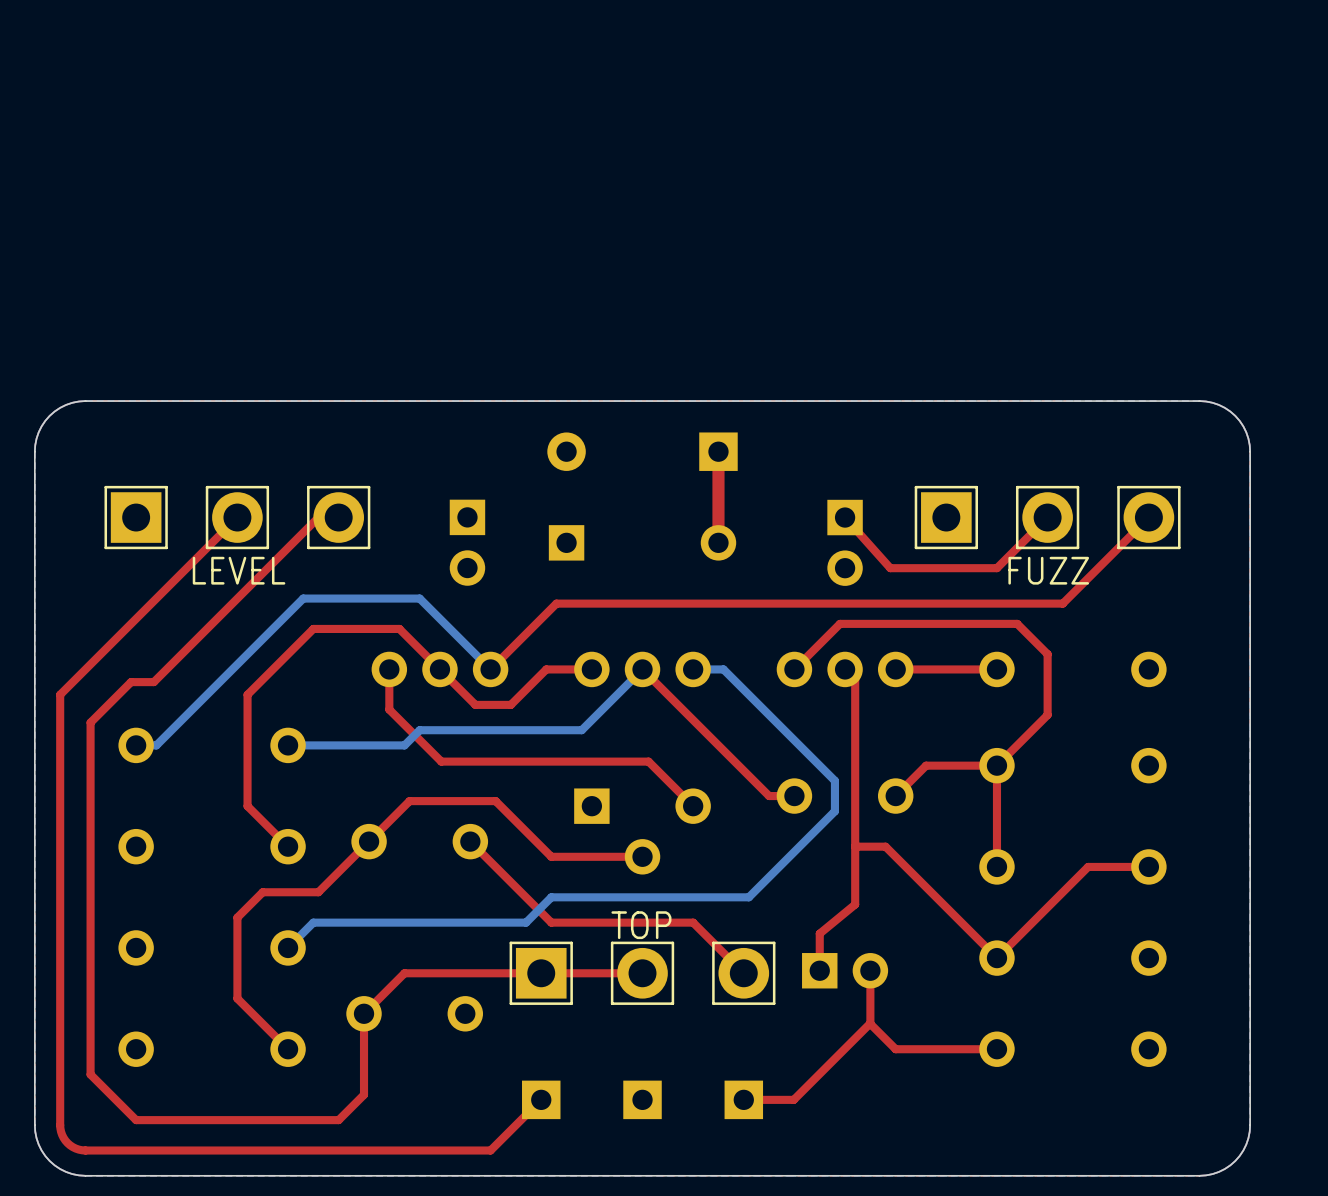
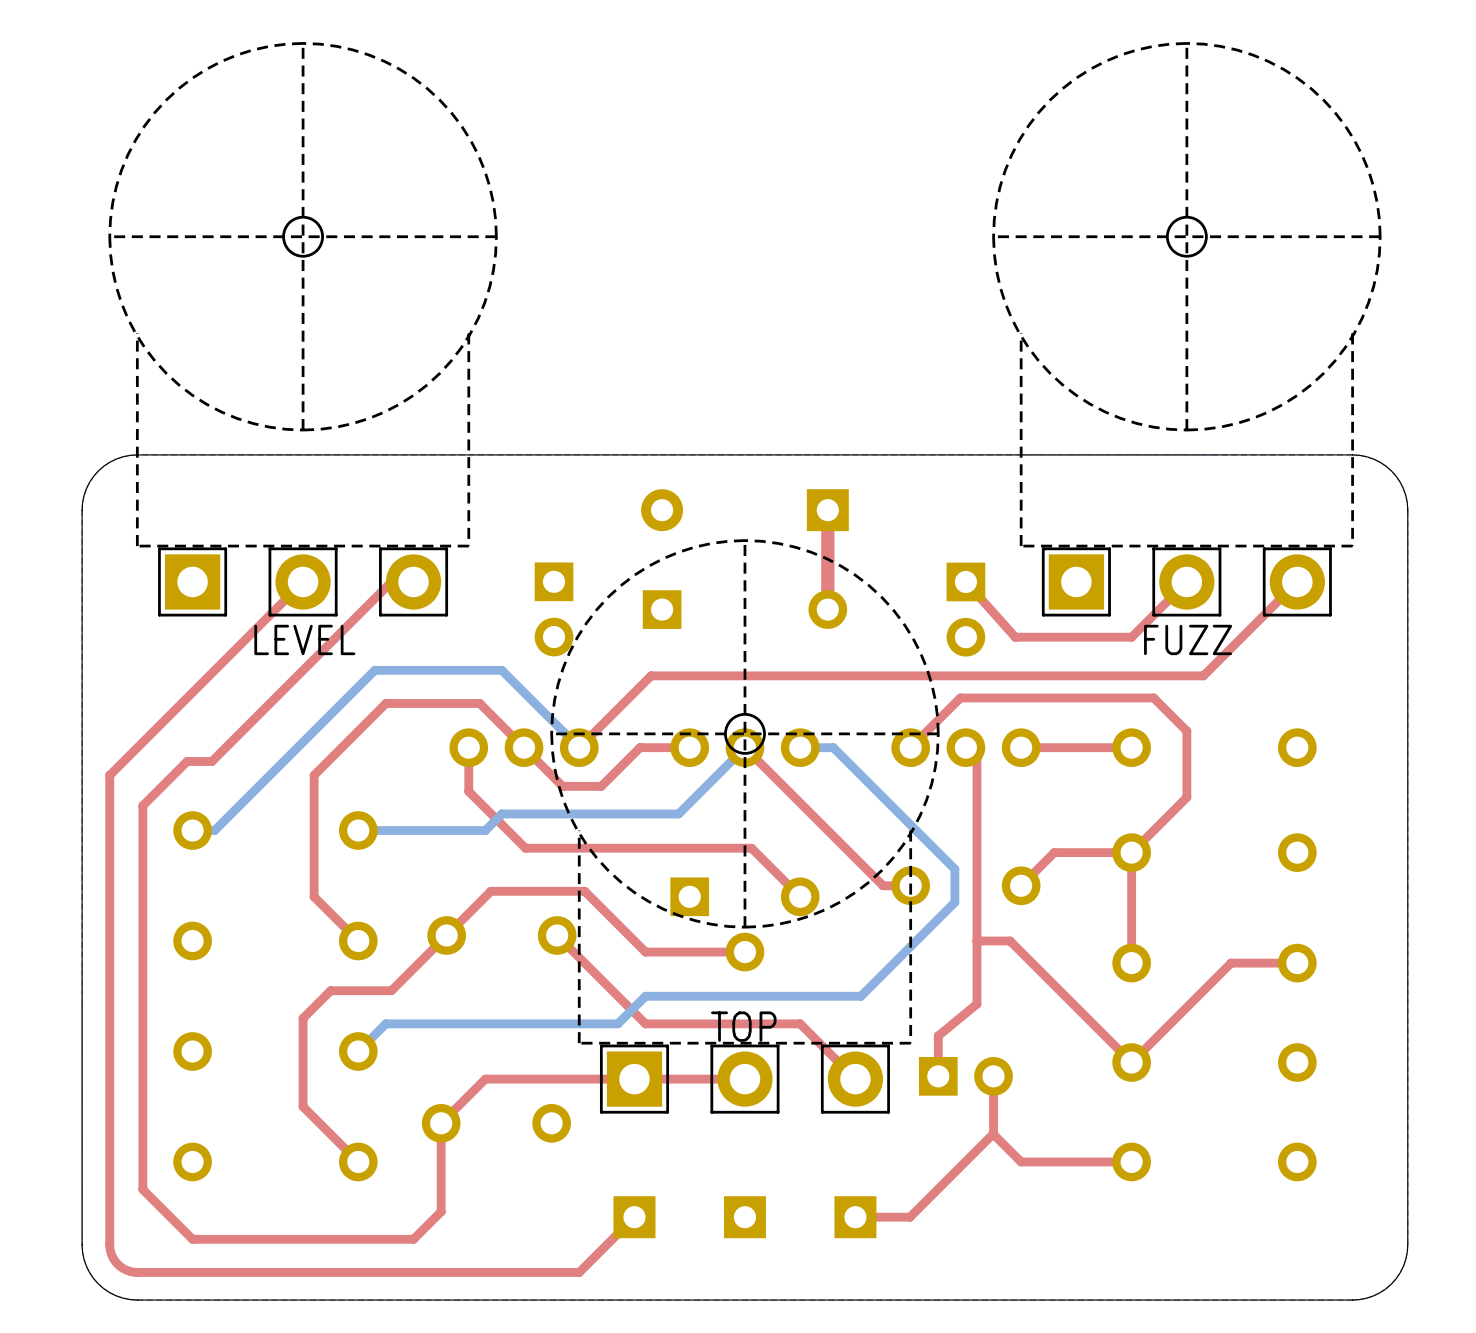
LEVEL: none -> (303, 329)
FUZZ: none -> (1186, 329)
LEVEL: (237, 517) -> none
FUZZ: (1047, 517) -> none
TOP: none -> (744, 826)
TOP: (642, 973) -> none

